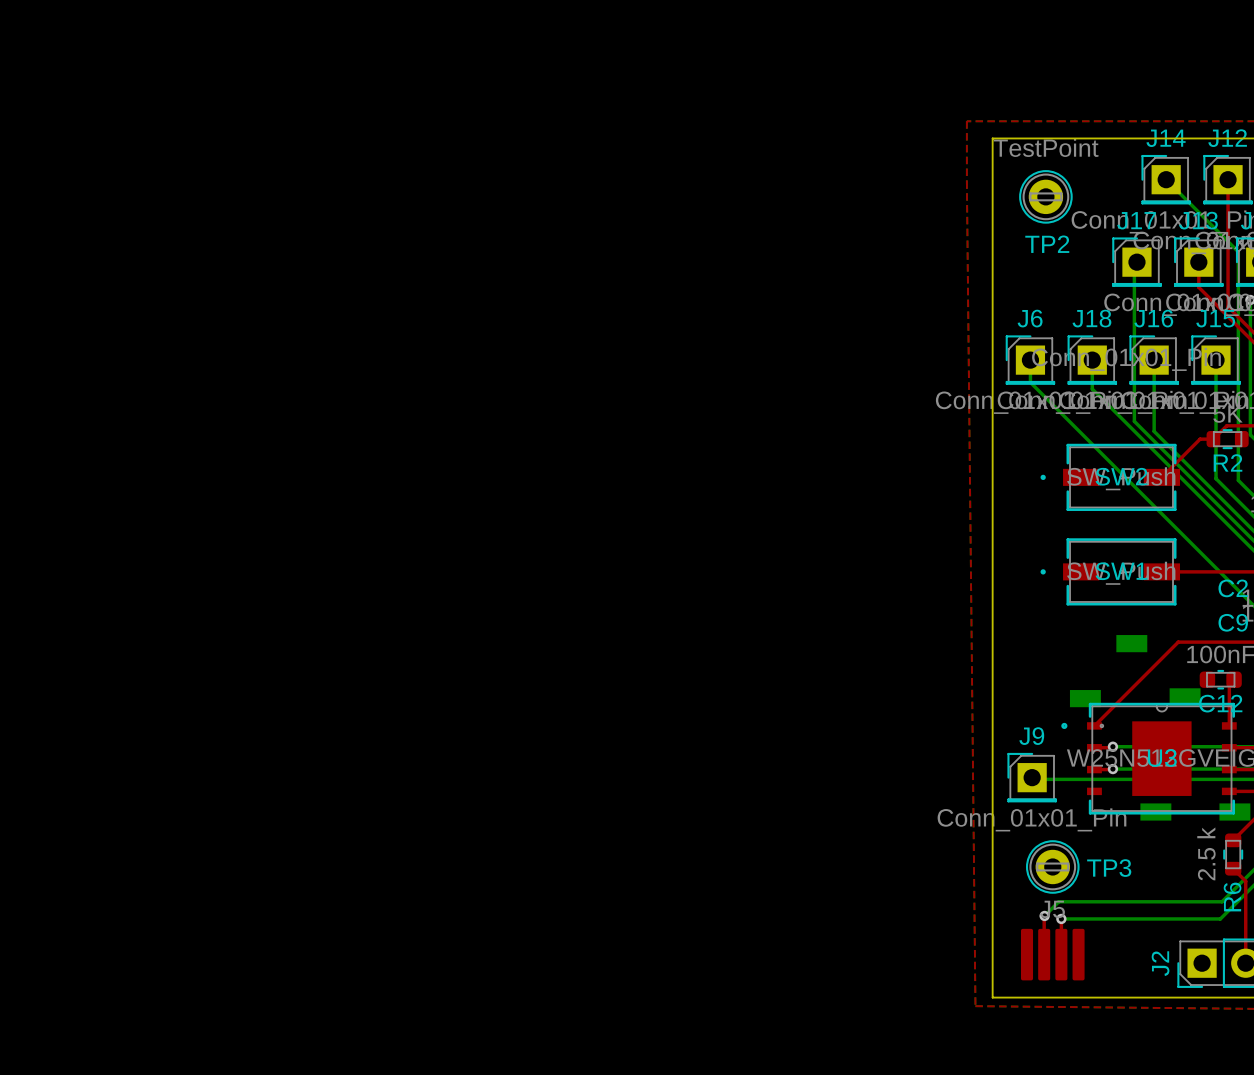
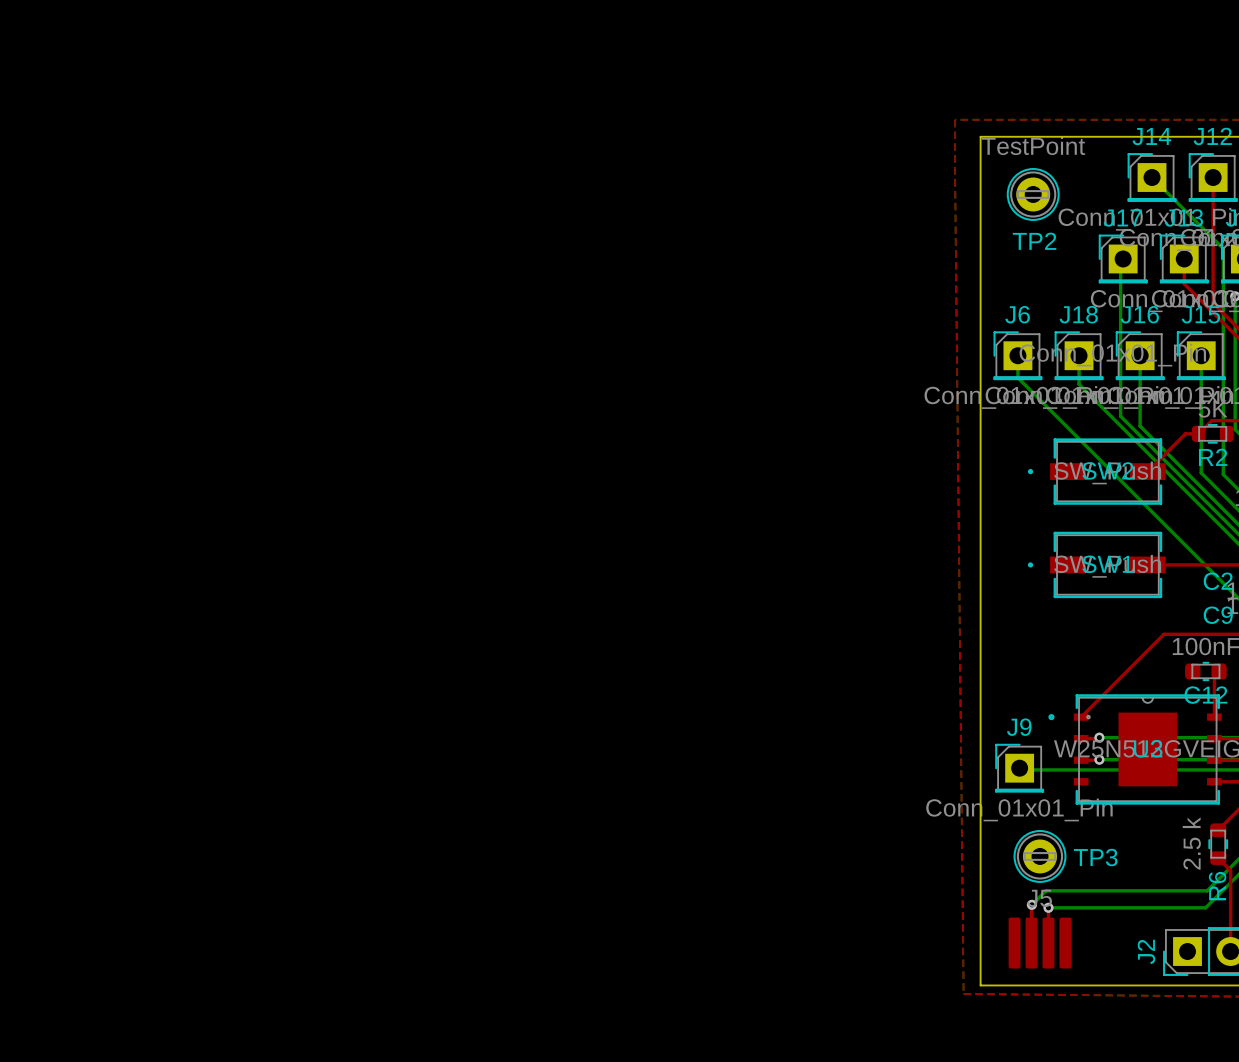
part: (1131, 643) -> none
part: (1185, 696) -> none
part: (1085, 698) -> none
part: (1155, 812) -> none
part: (1234, 812) -> none

